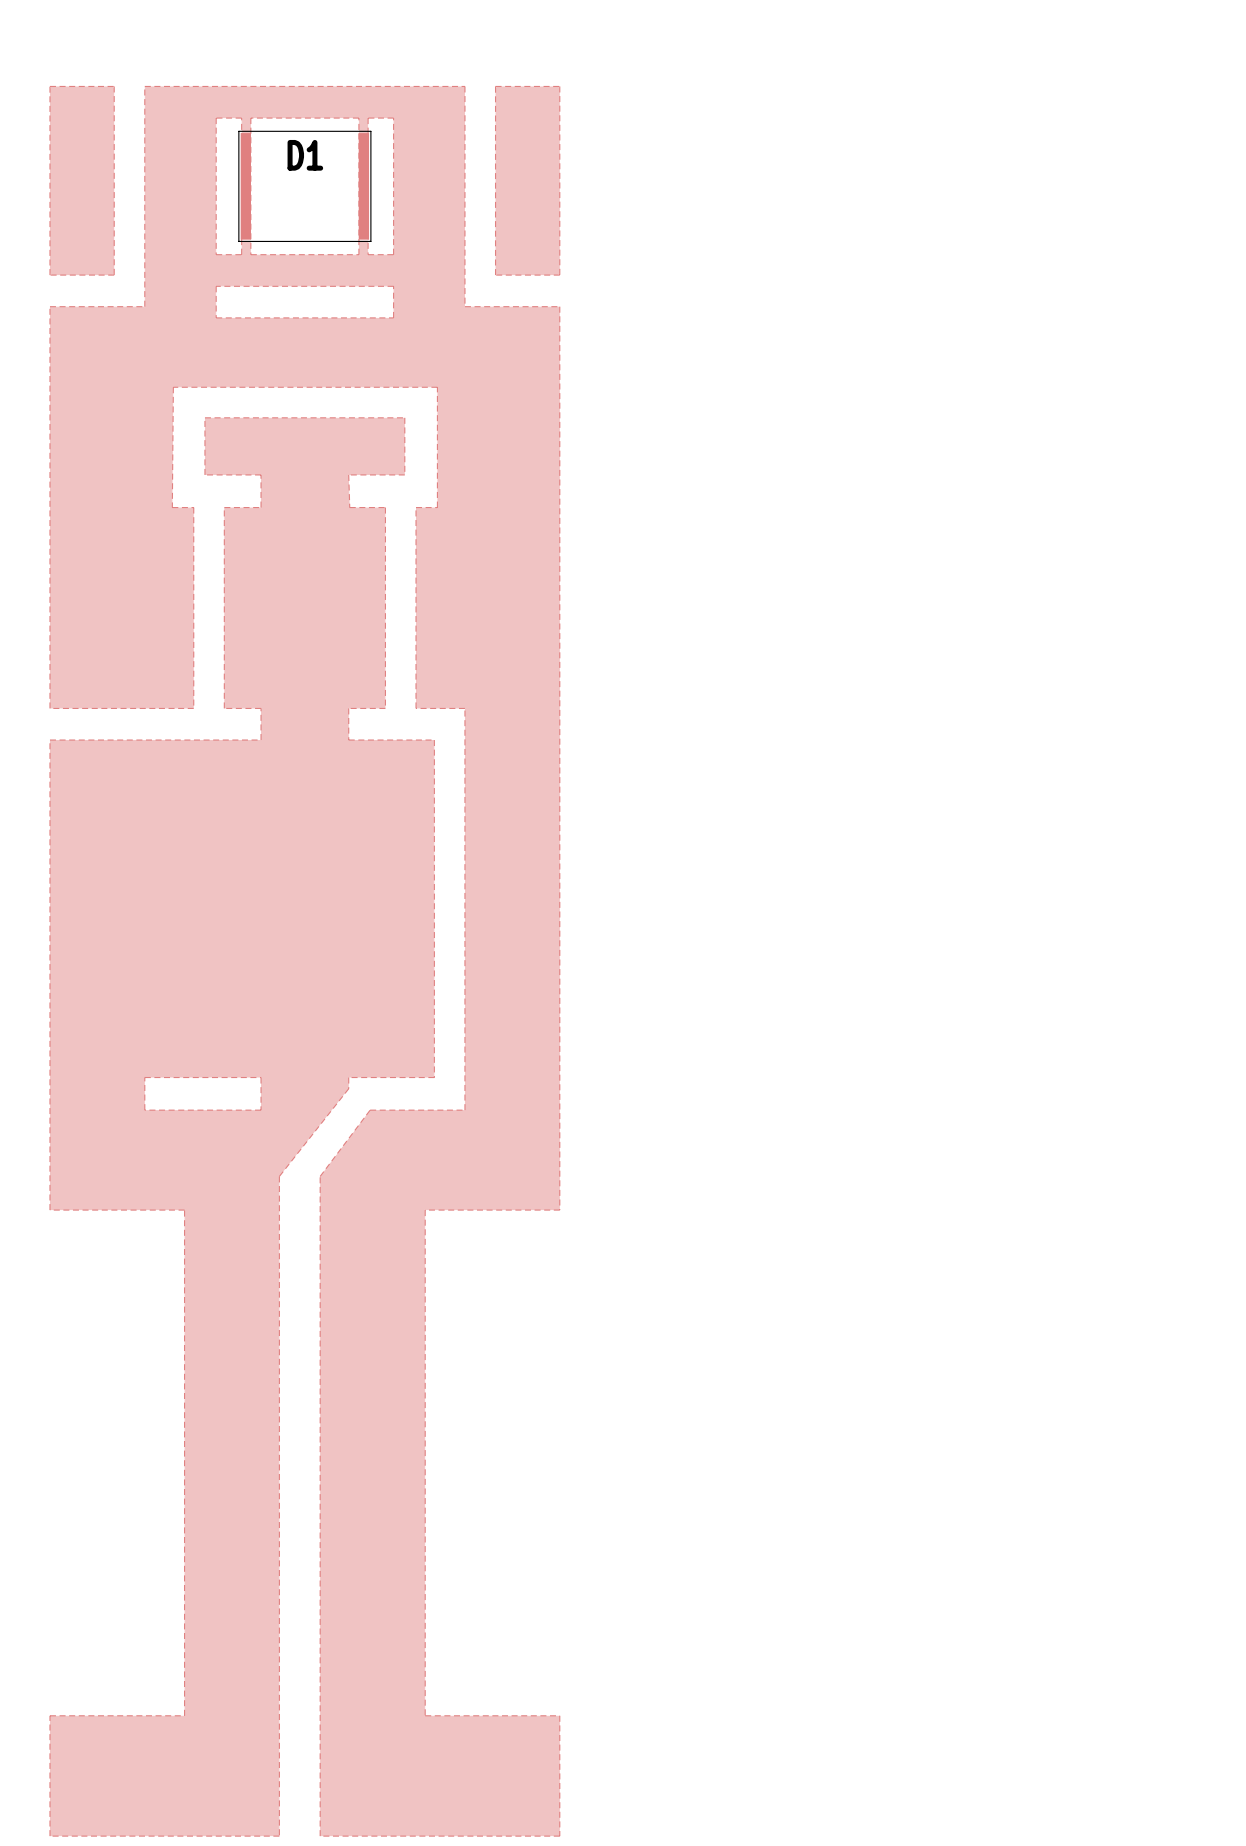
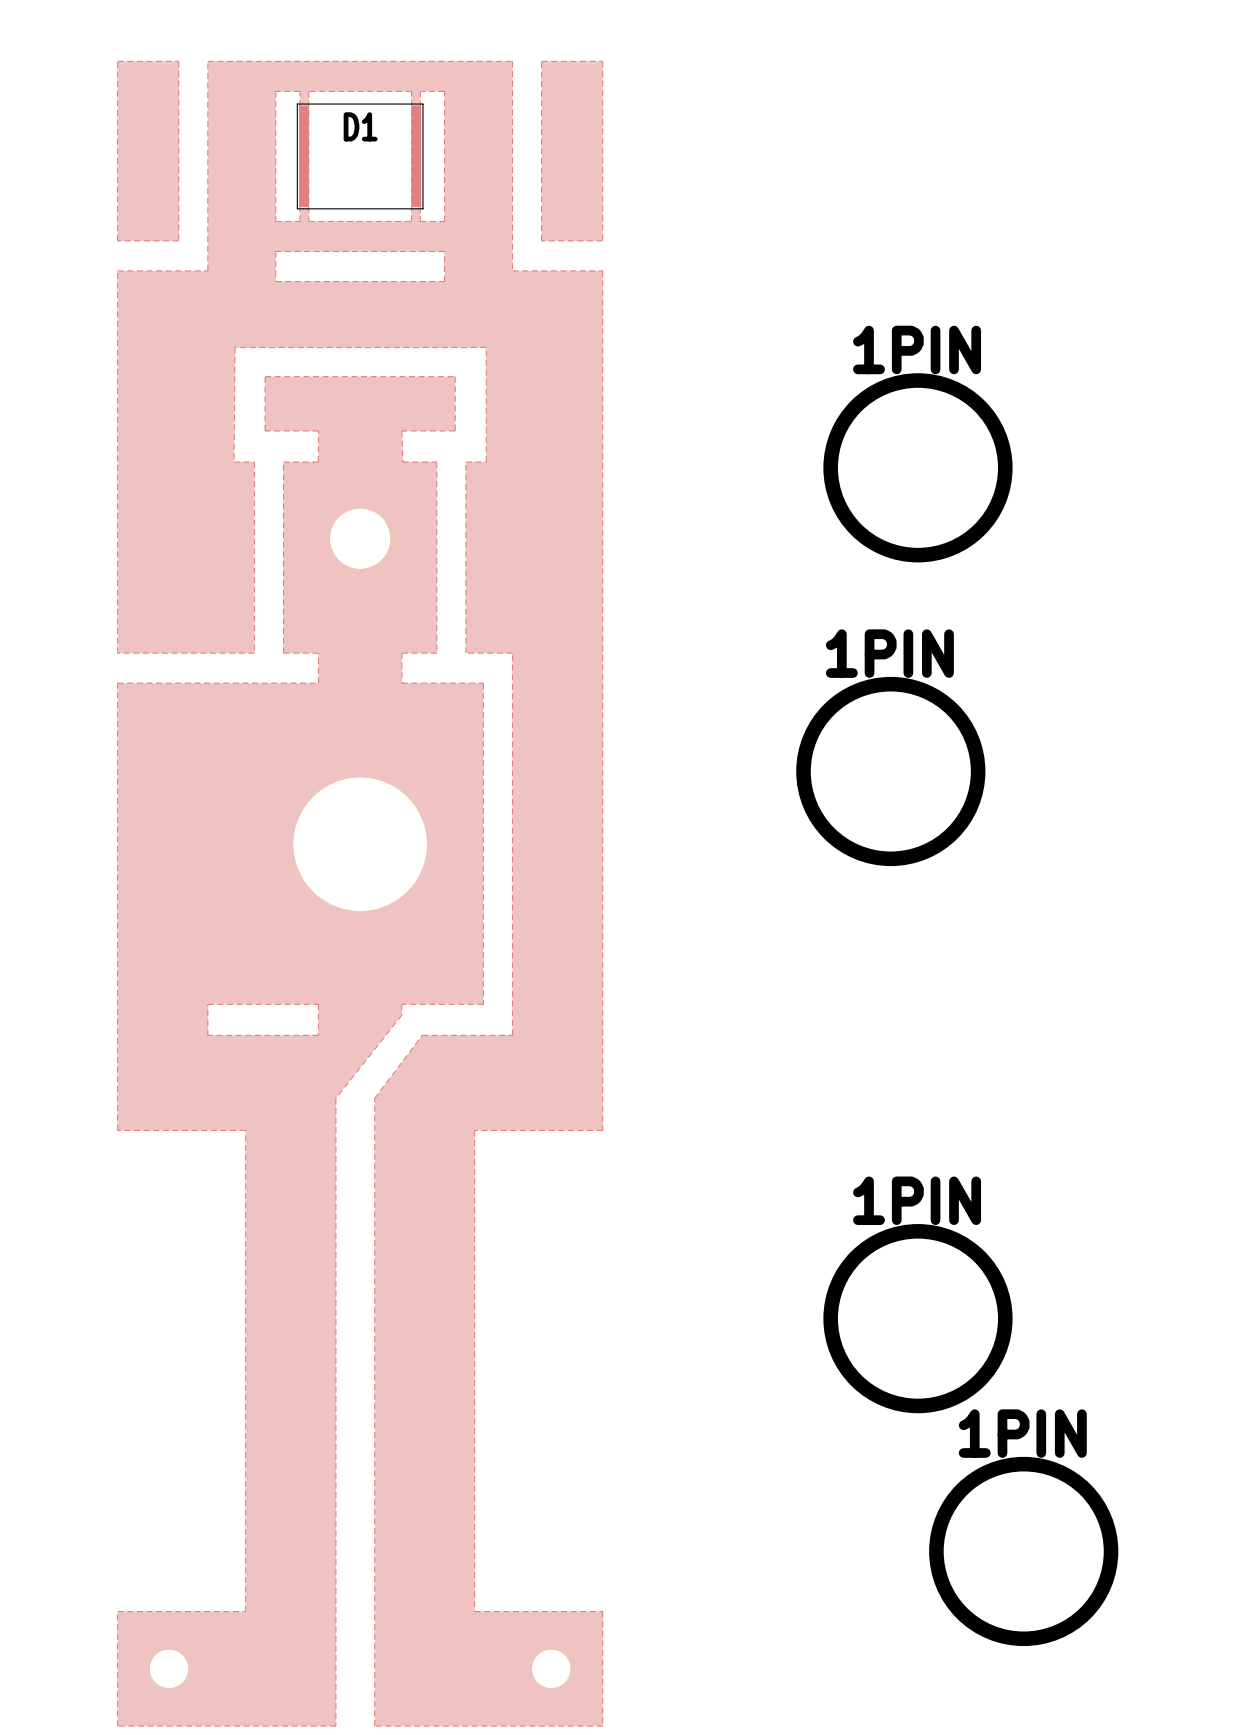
1PIN: none -> (671, 471)
1PIN: none -> (639, 794)
1PIN: none -> (581, 1456)
1PIN: none -> (825, 1572)

